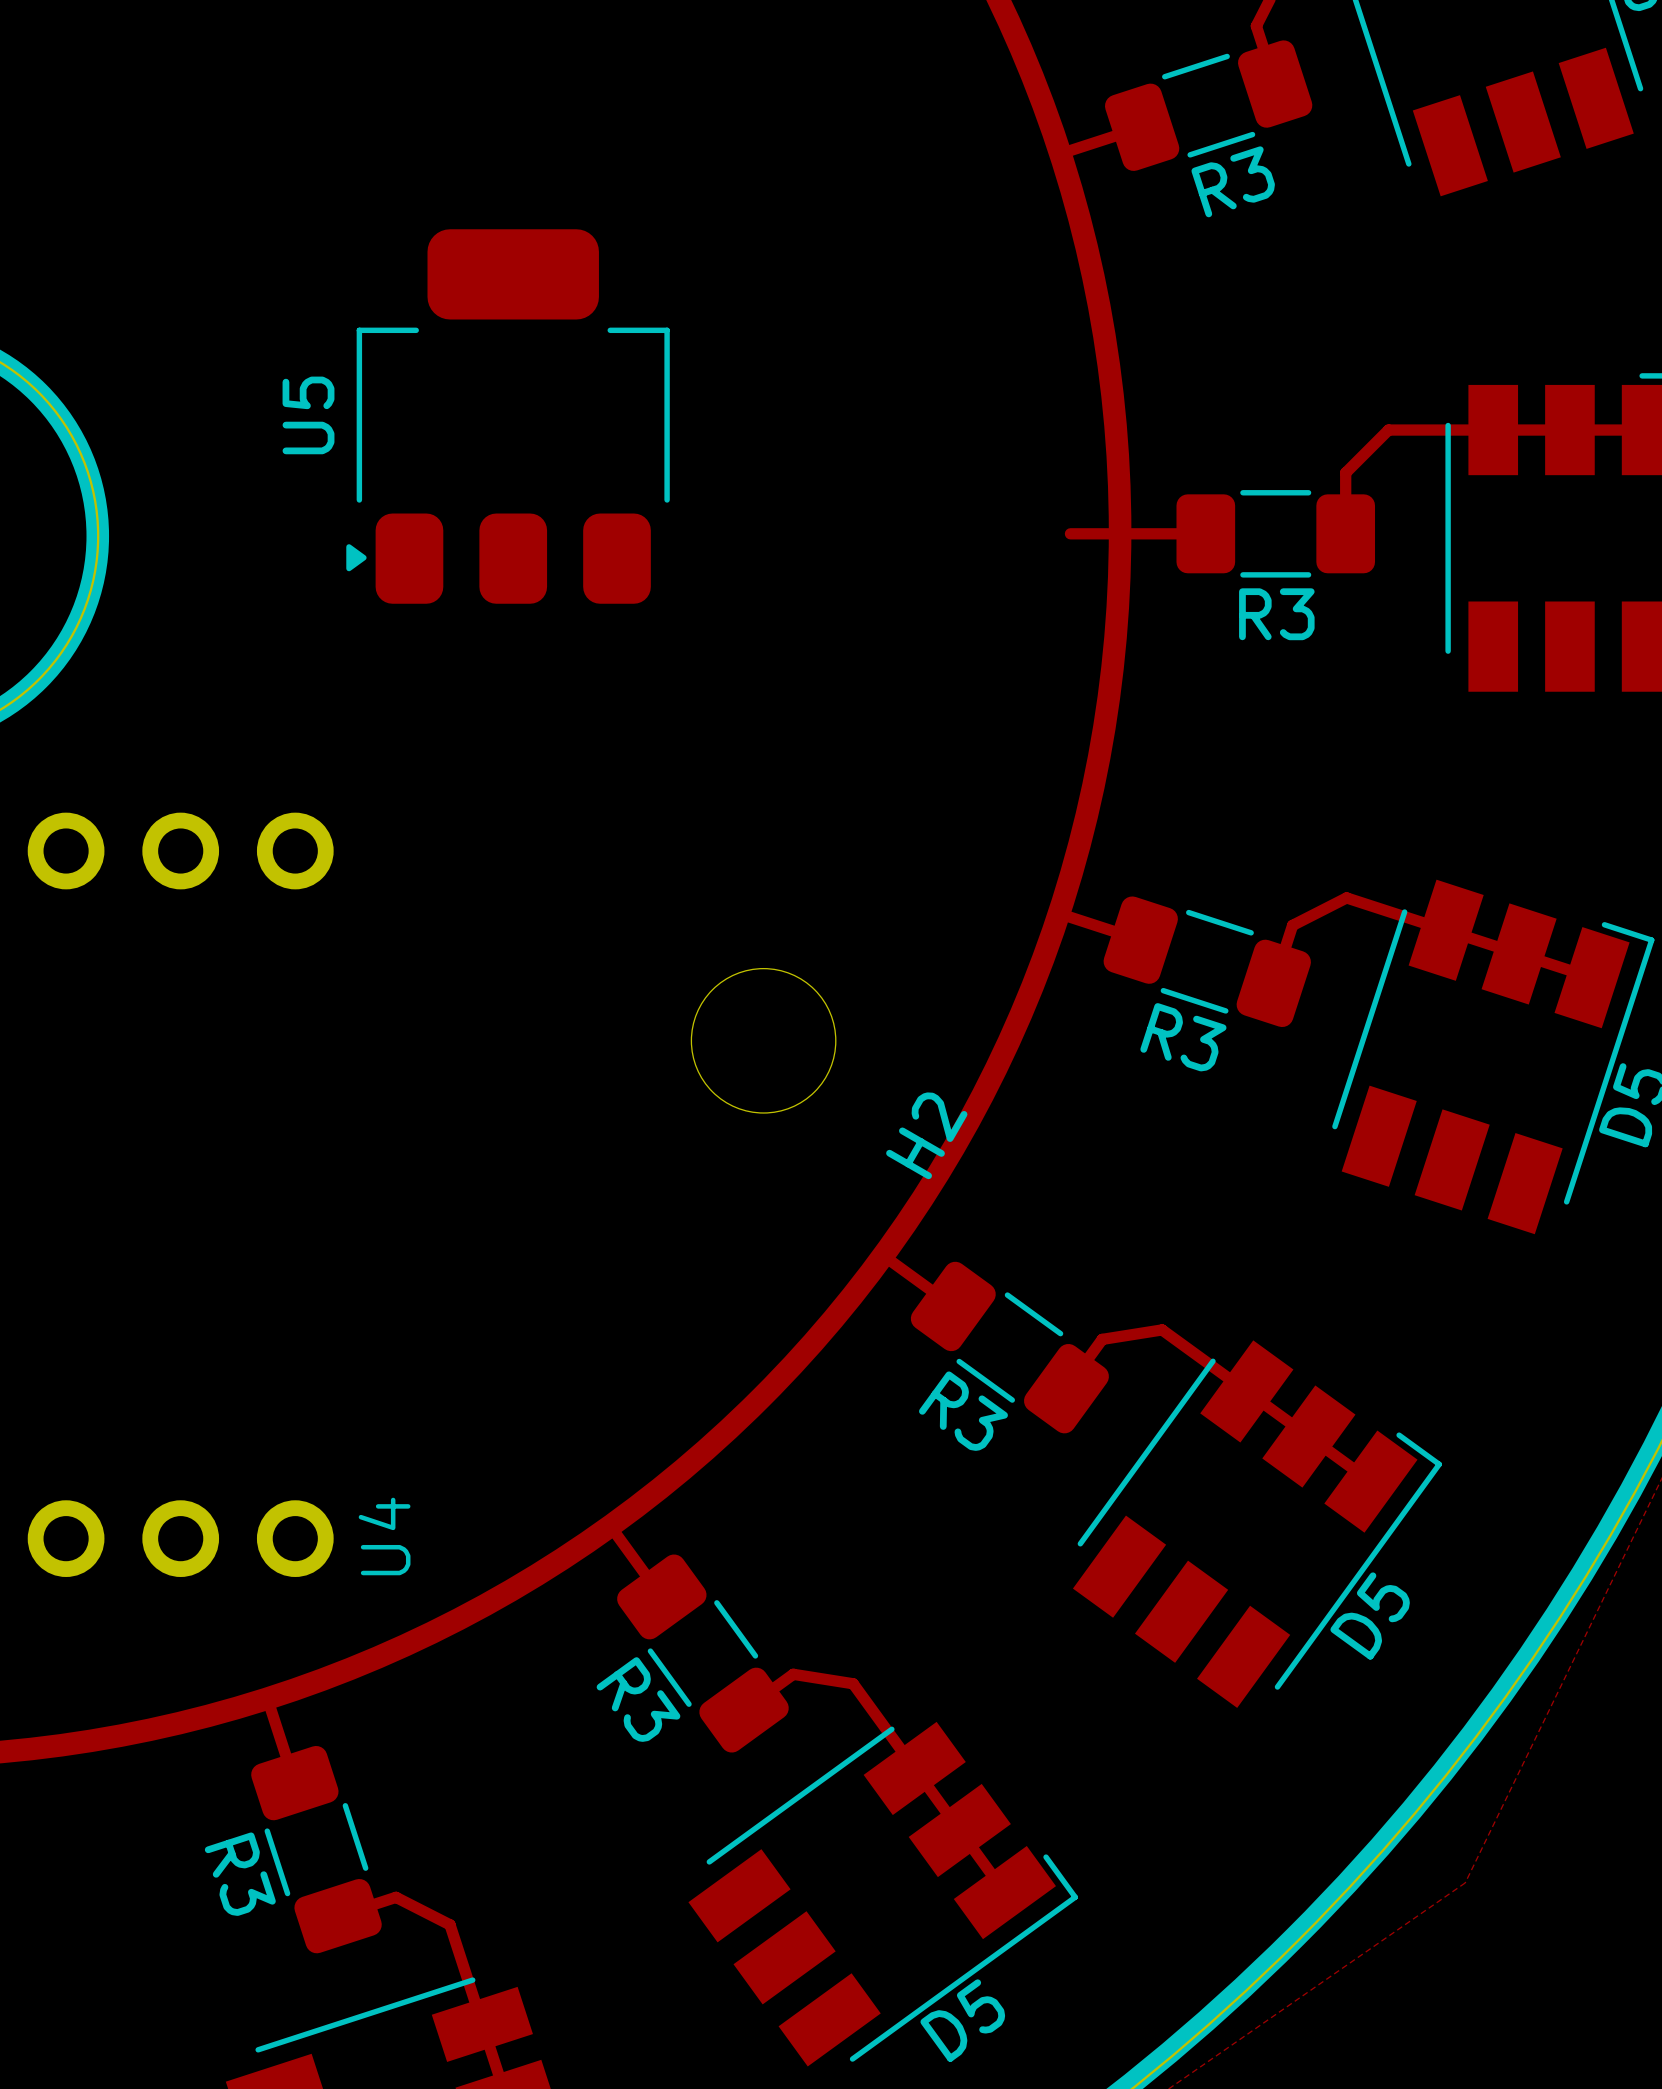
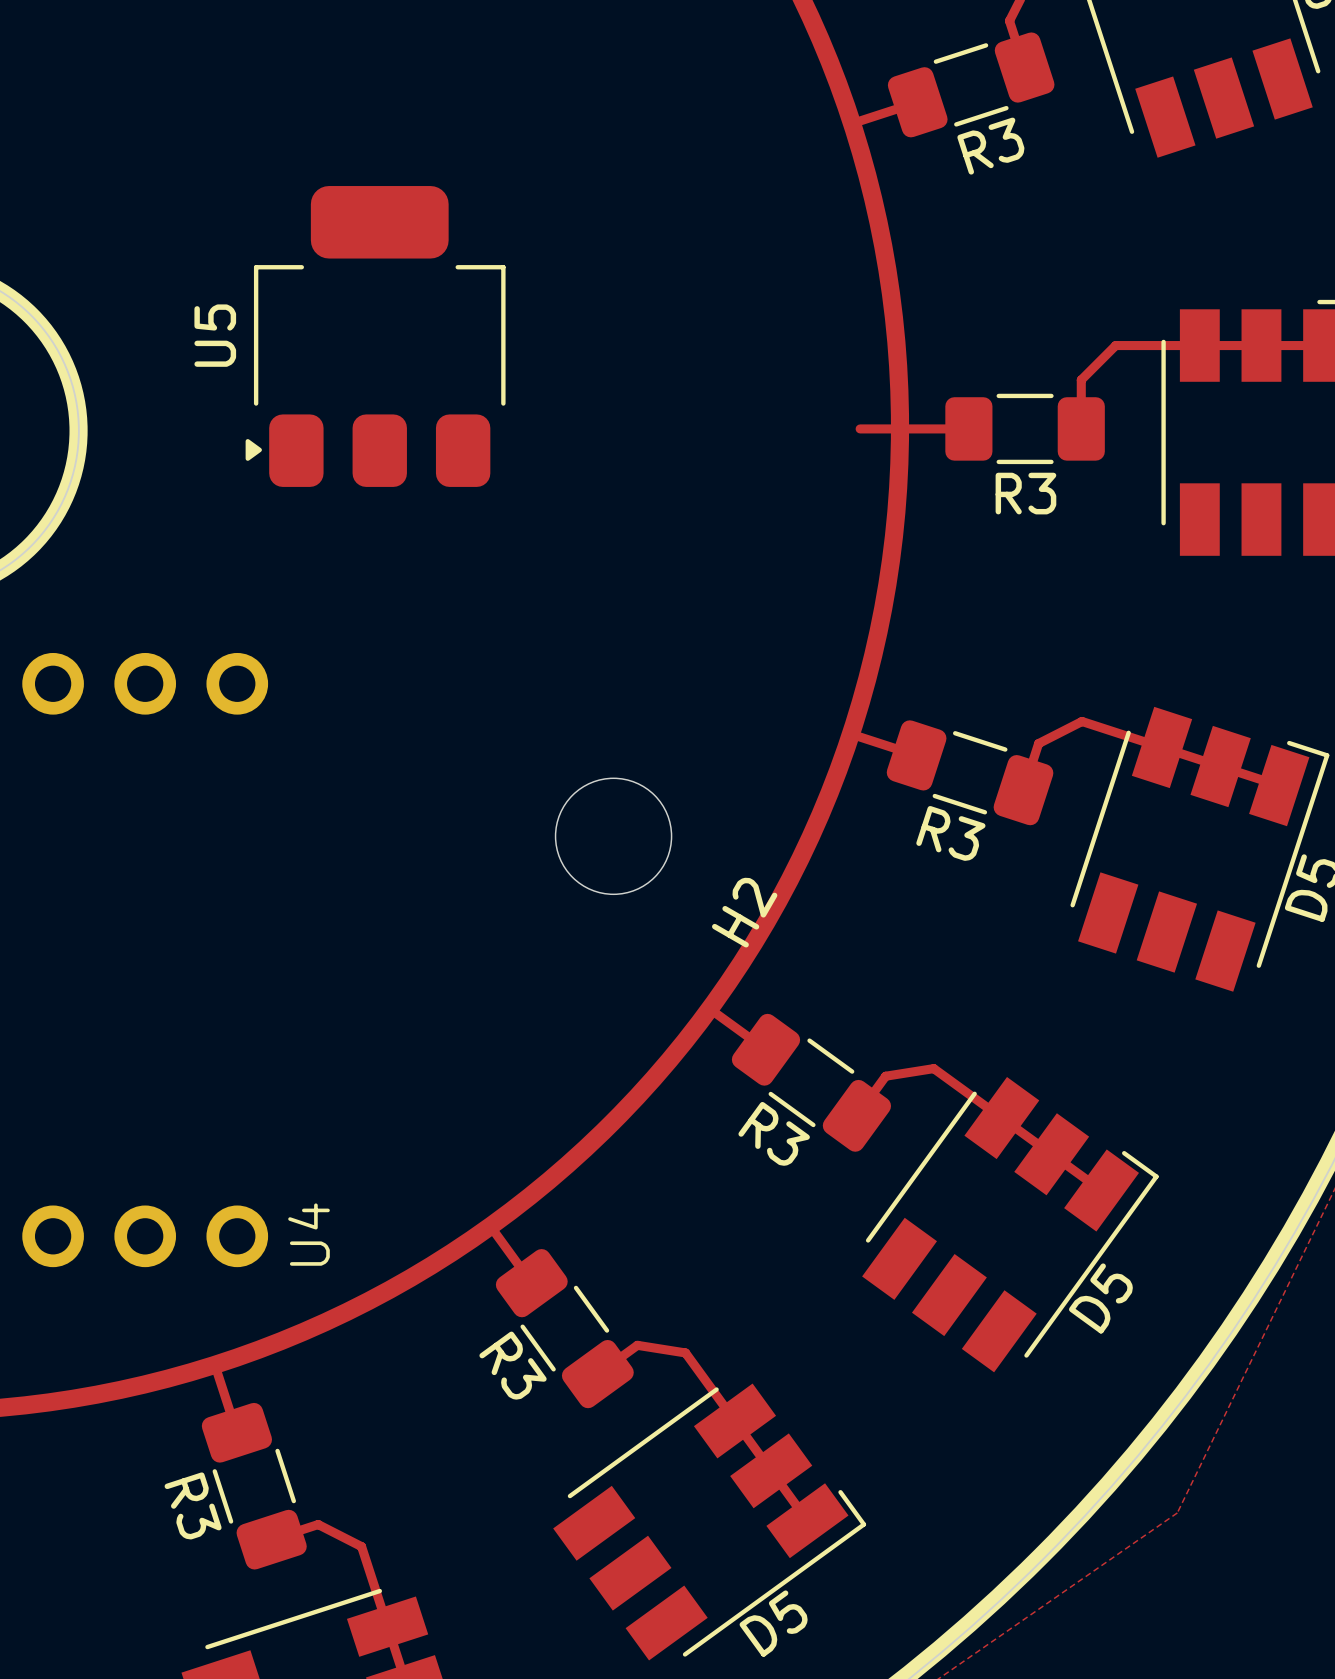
U5 position: (508, 416) -> (375, 336)

